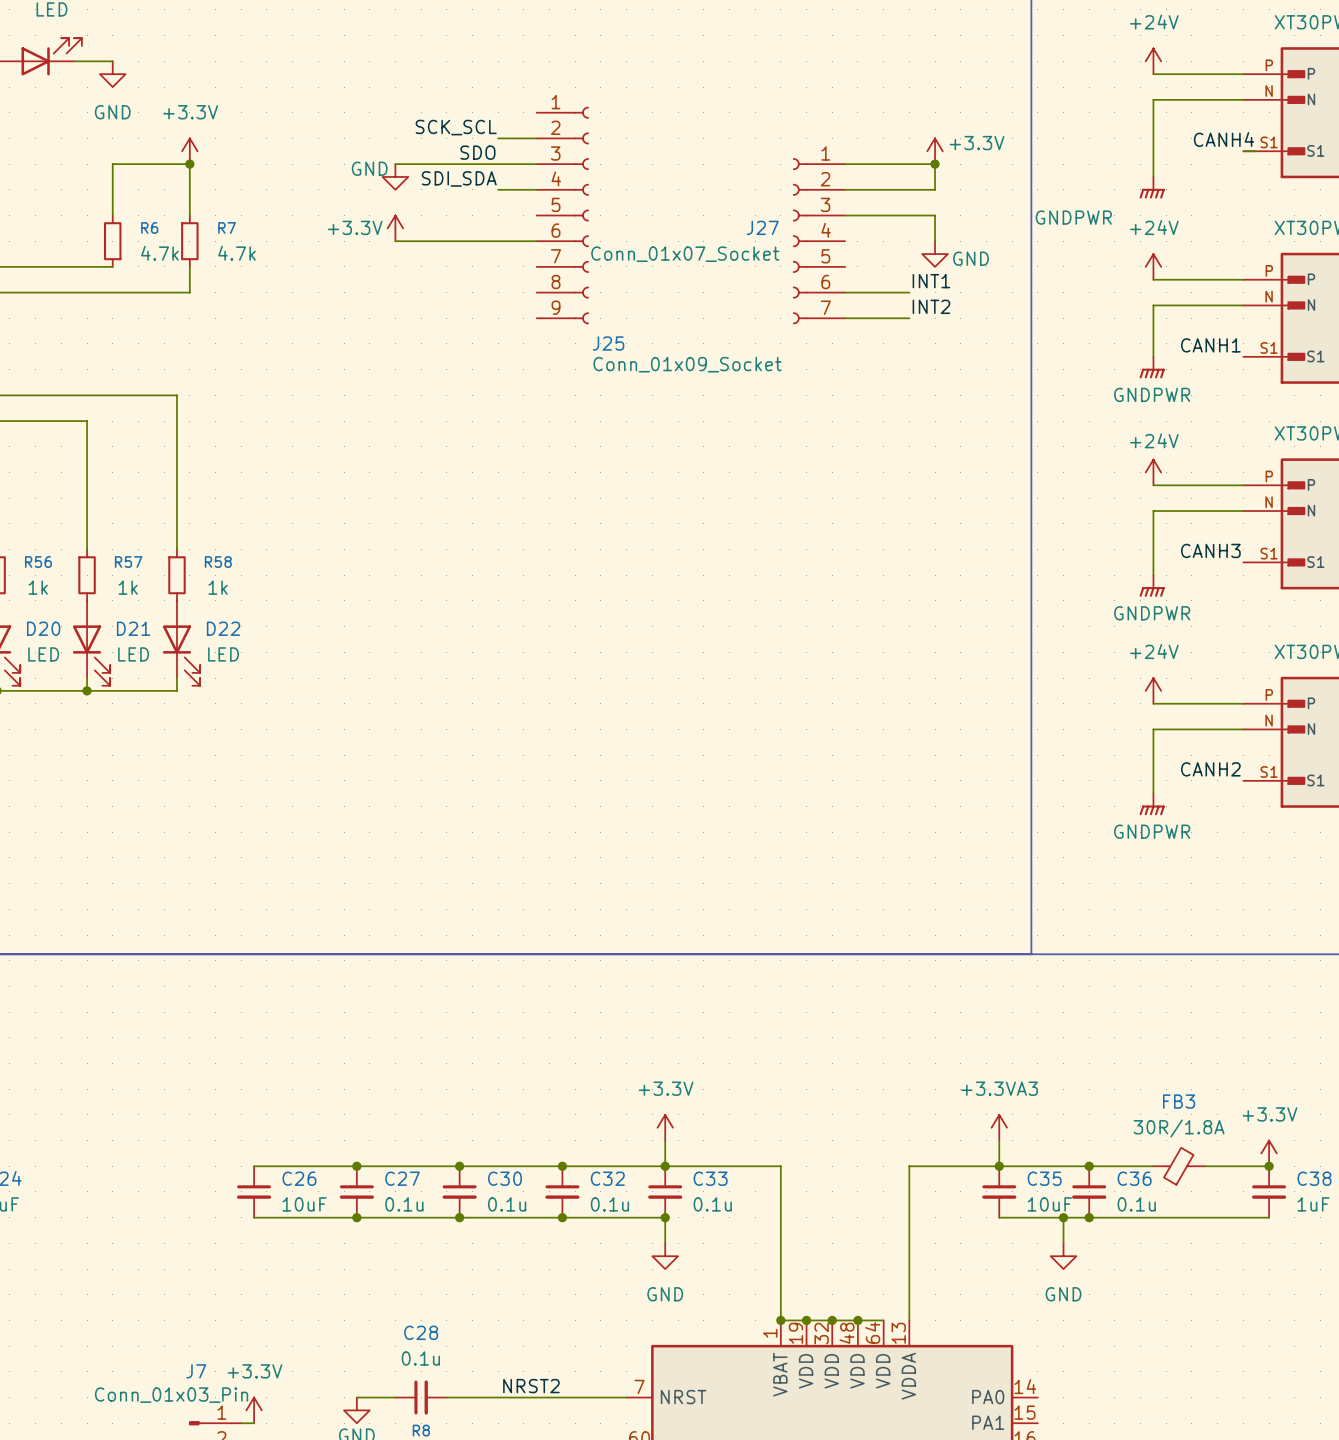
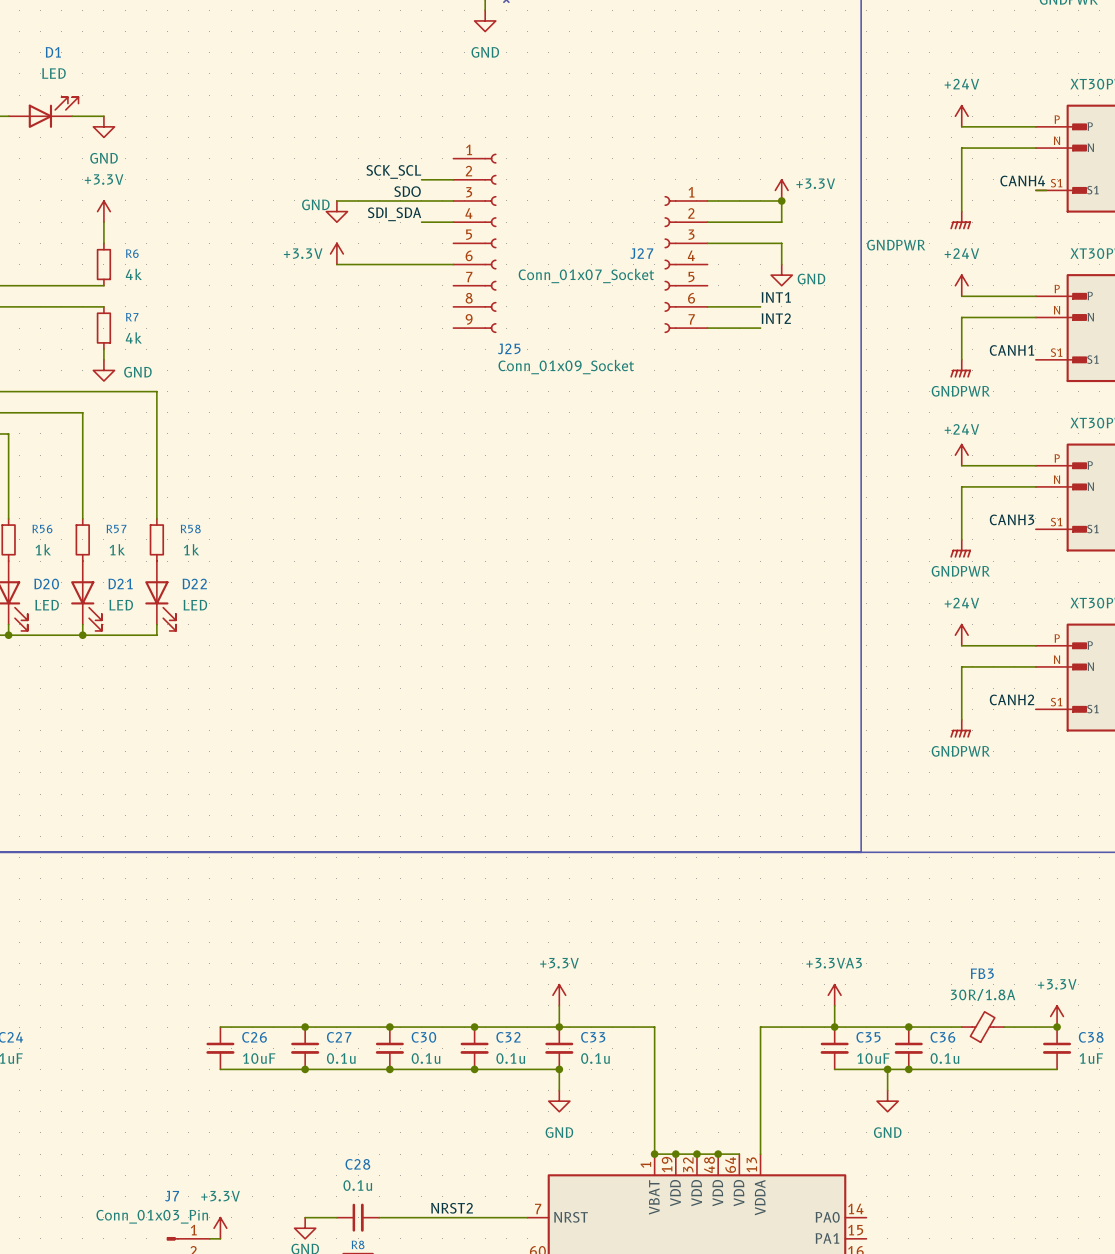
power symbol position: +3.3V (189, 151) -> +3.3V (103, 211)
junction: (189, 164) -> none
wire: (112, 189) (112, 164) (189, 164) (189, 215) -> none
R7 position: (189, 241) -> (103, 328)
R6 value: 4.7k (159, 253) -> 4k (133, 274)
R7 value: 4.7k (237, 253) -> 4k (133, 337)
wire: (189, 266) (189, 292) (112, 292) -> none
wire: none -> (103, 349) (103, 359)
power symbol: none -> GND (103, 370)

